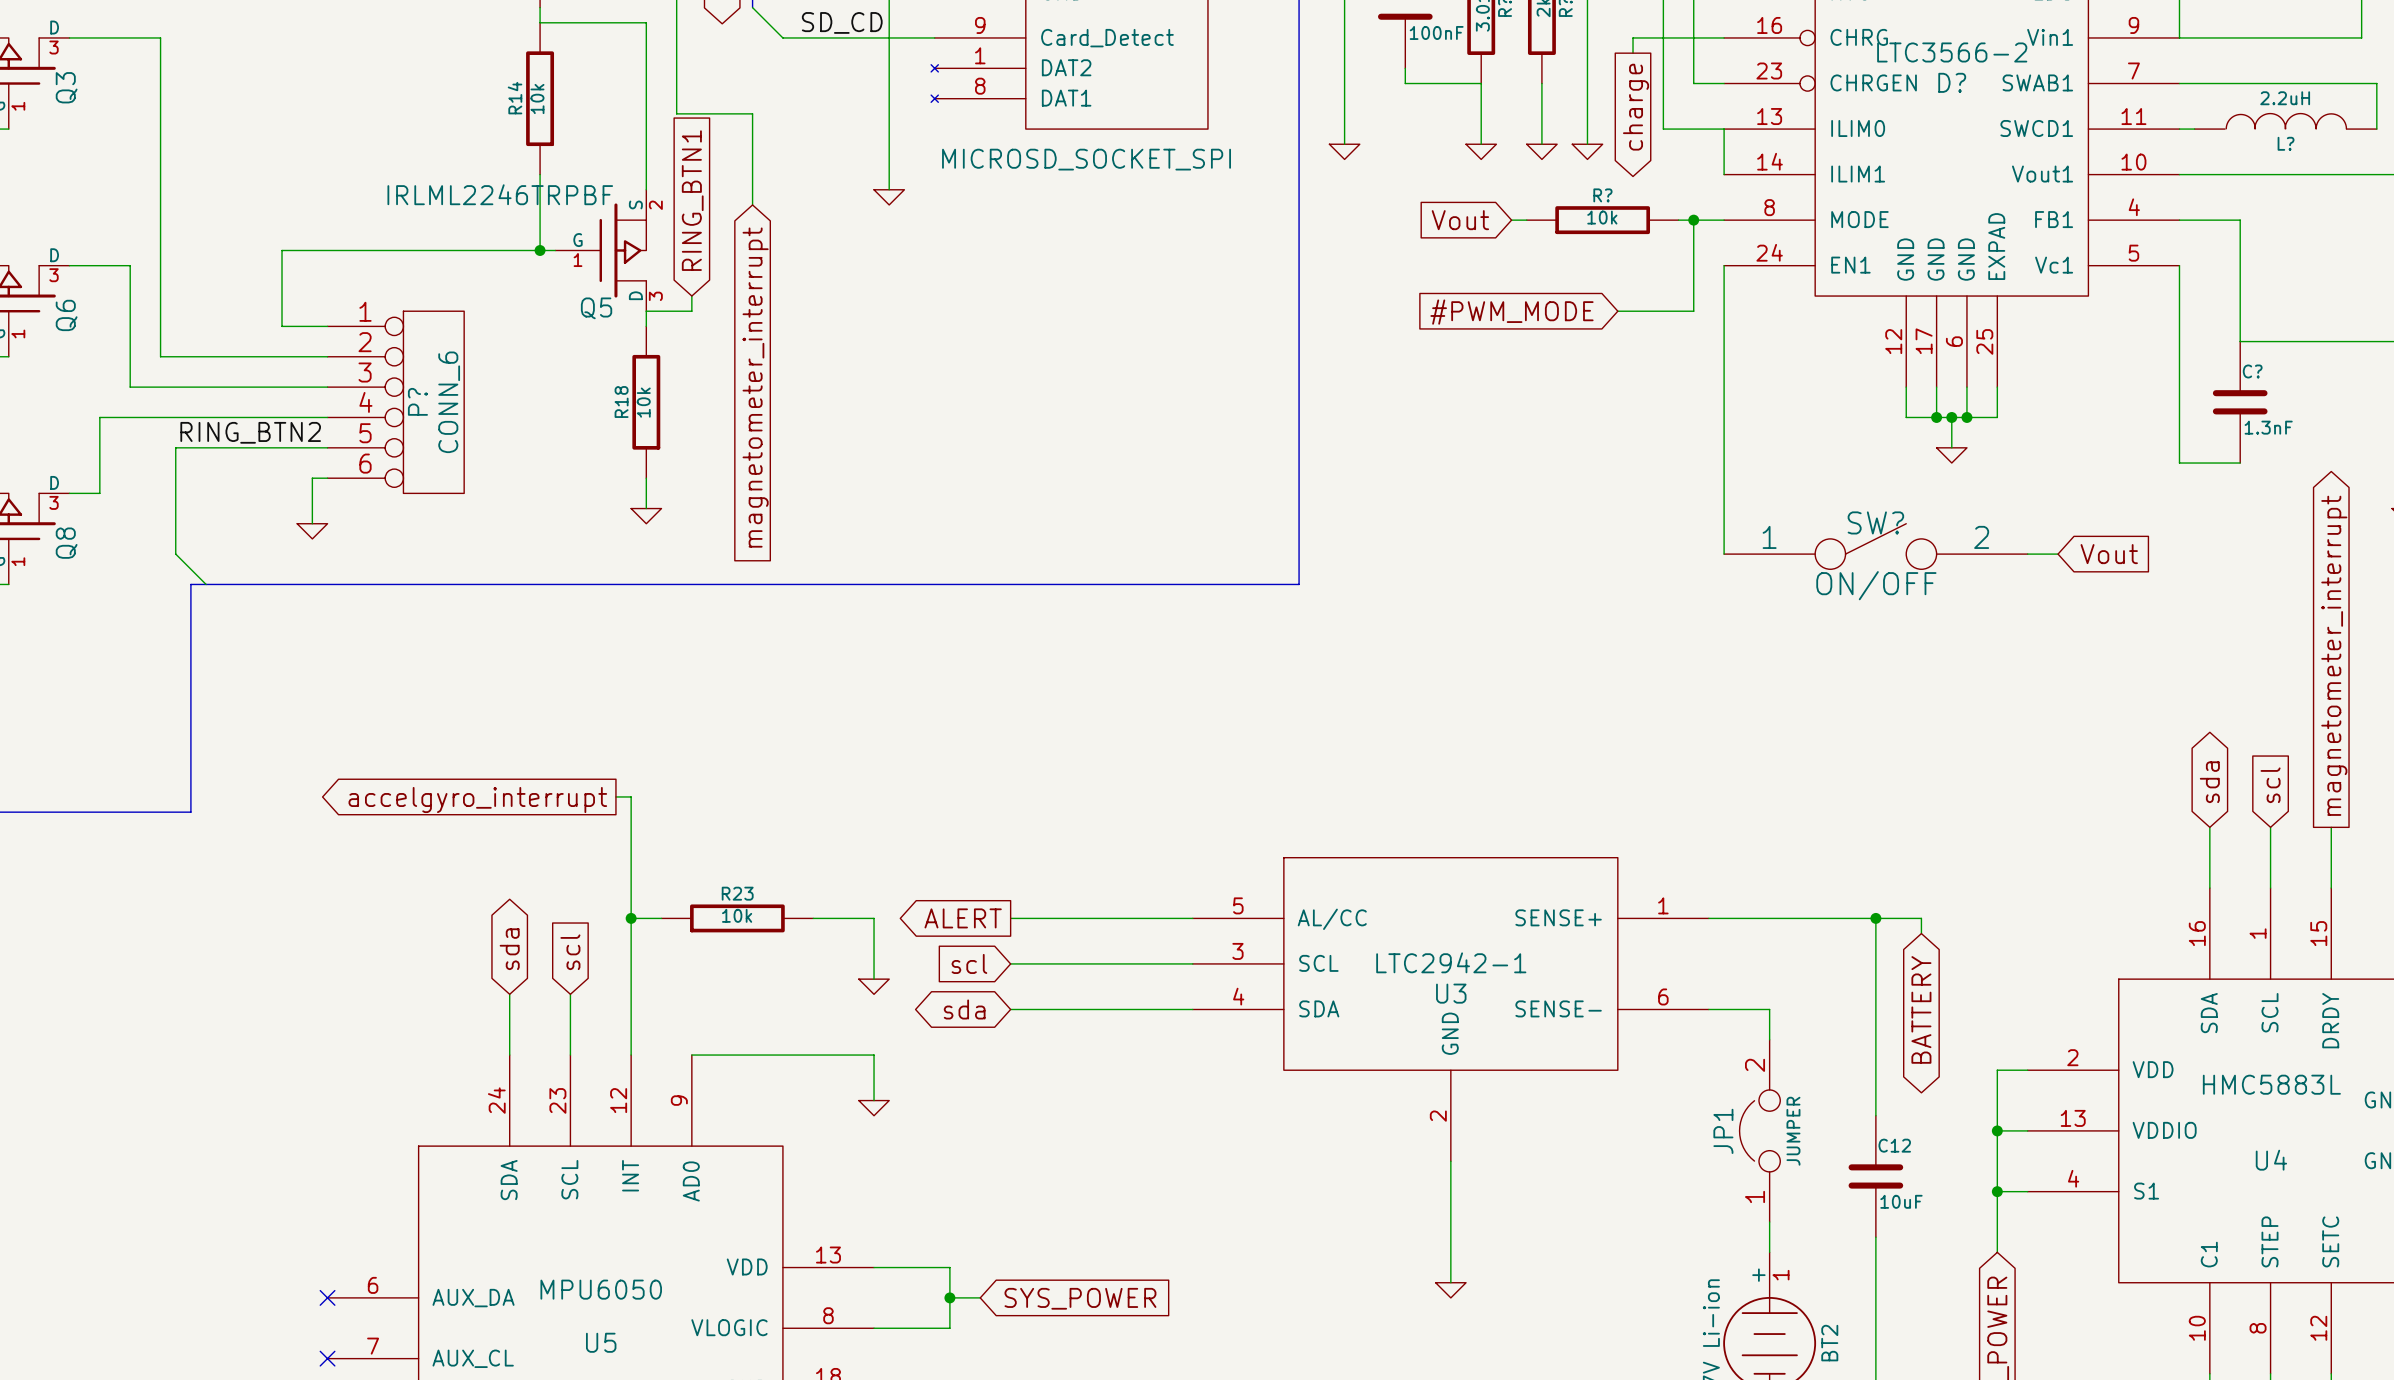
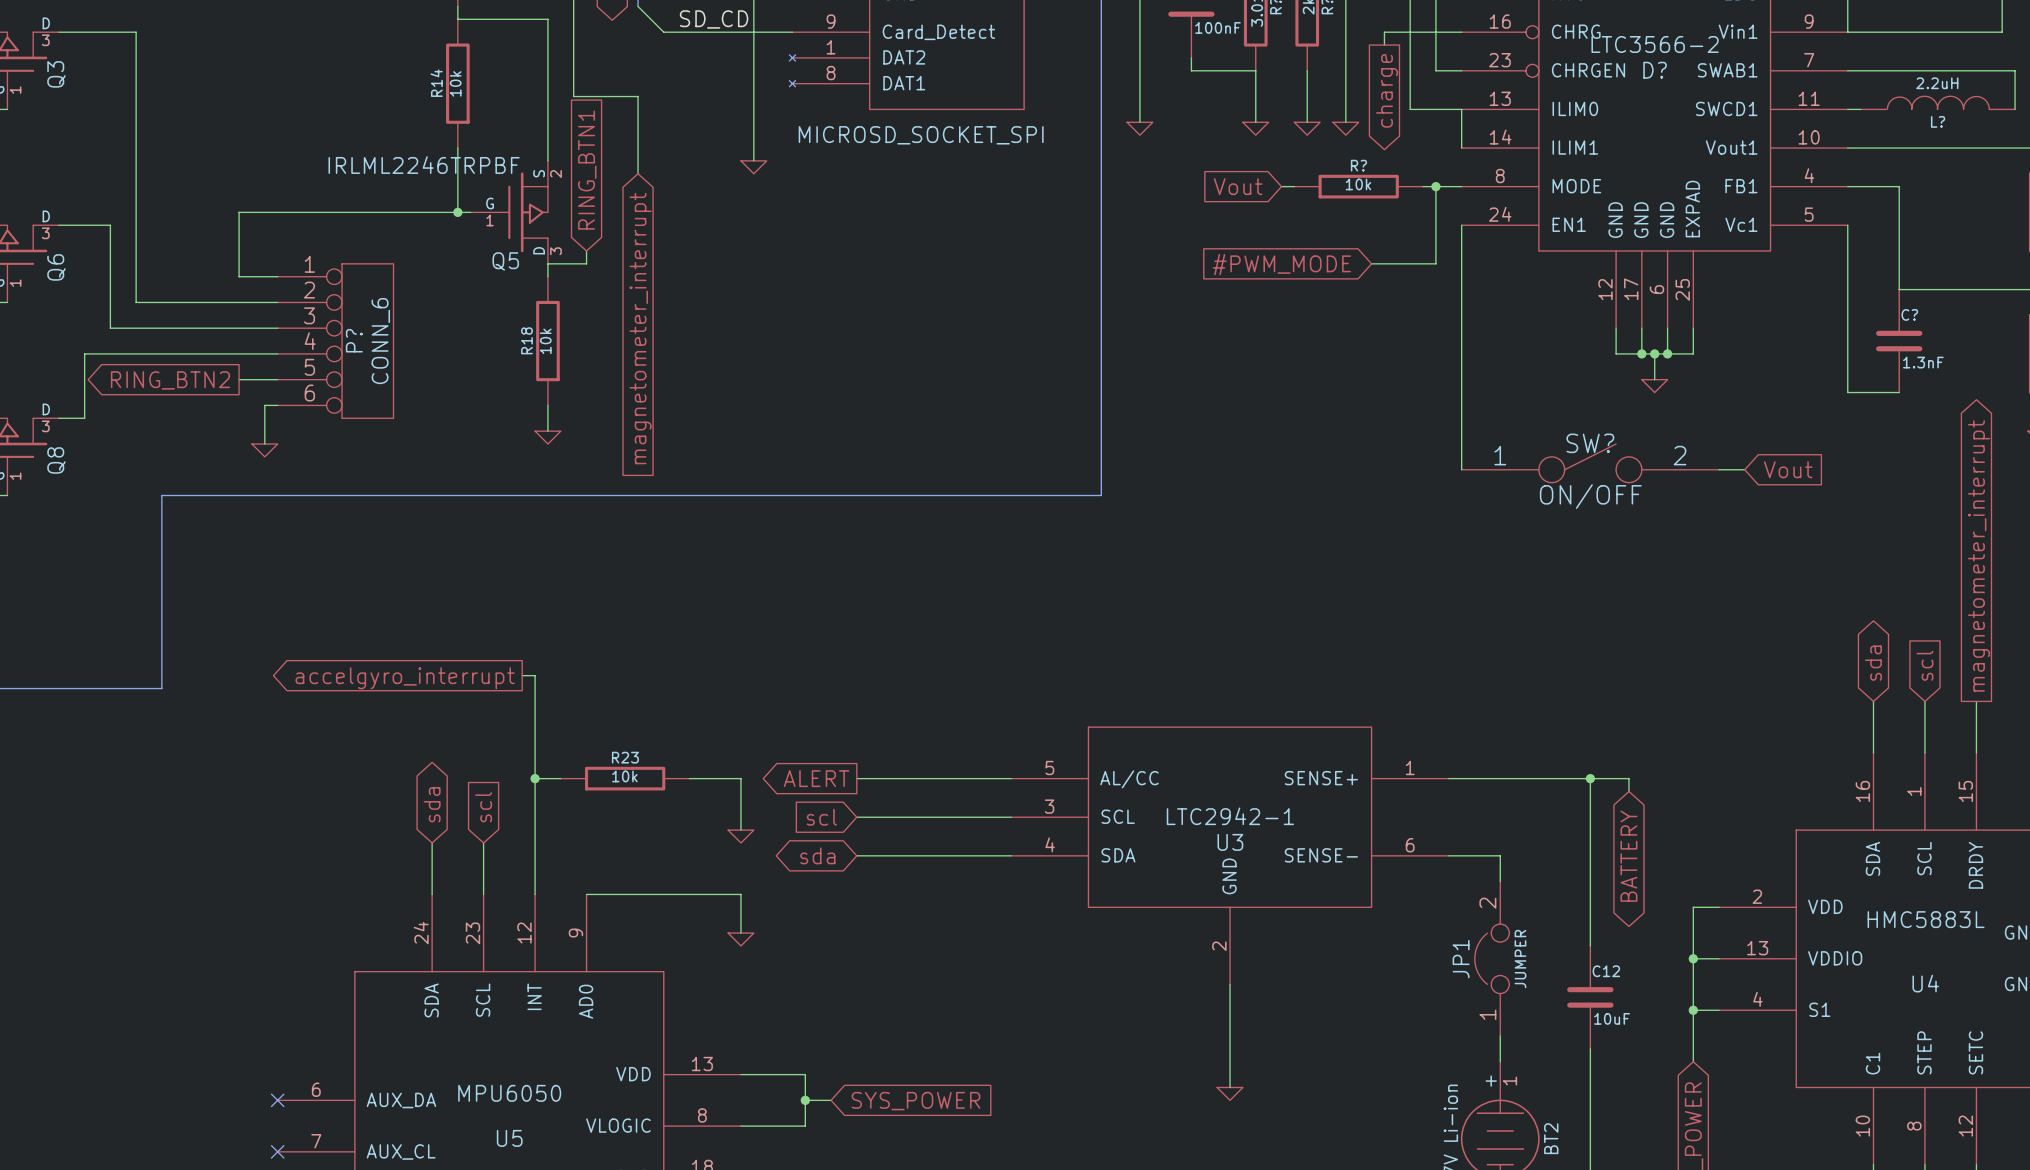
label: RING_BTN2 (250, 432) -> none
wire: (282, 447) (175, 447) (175, 554) (206, 584) -> none
global label: none -> RING_BTN2 (170, 380)

